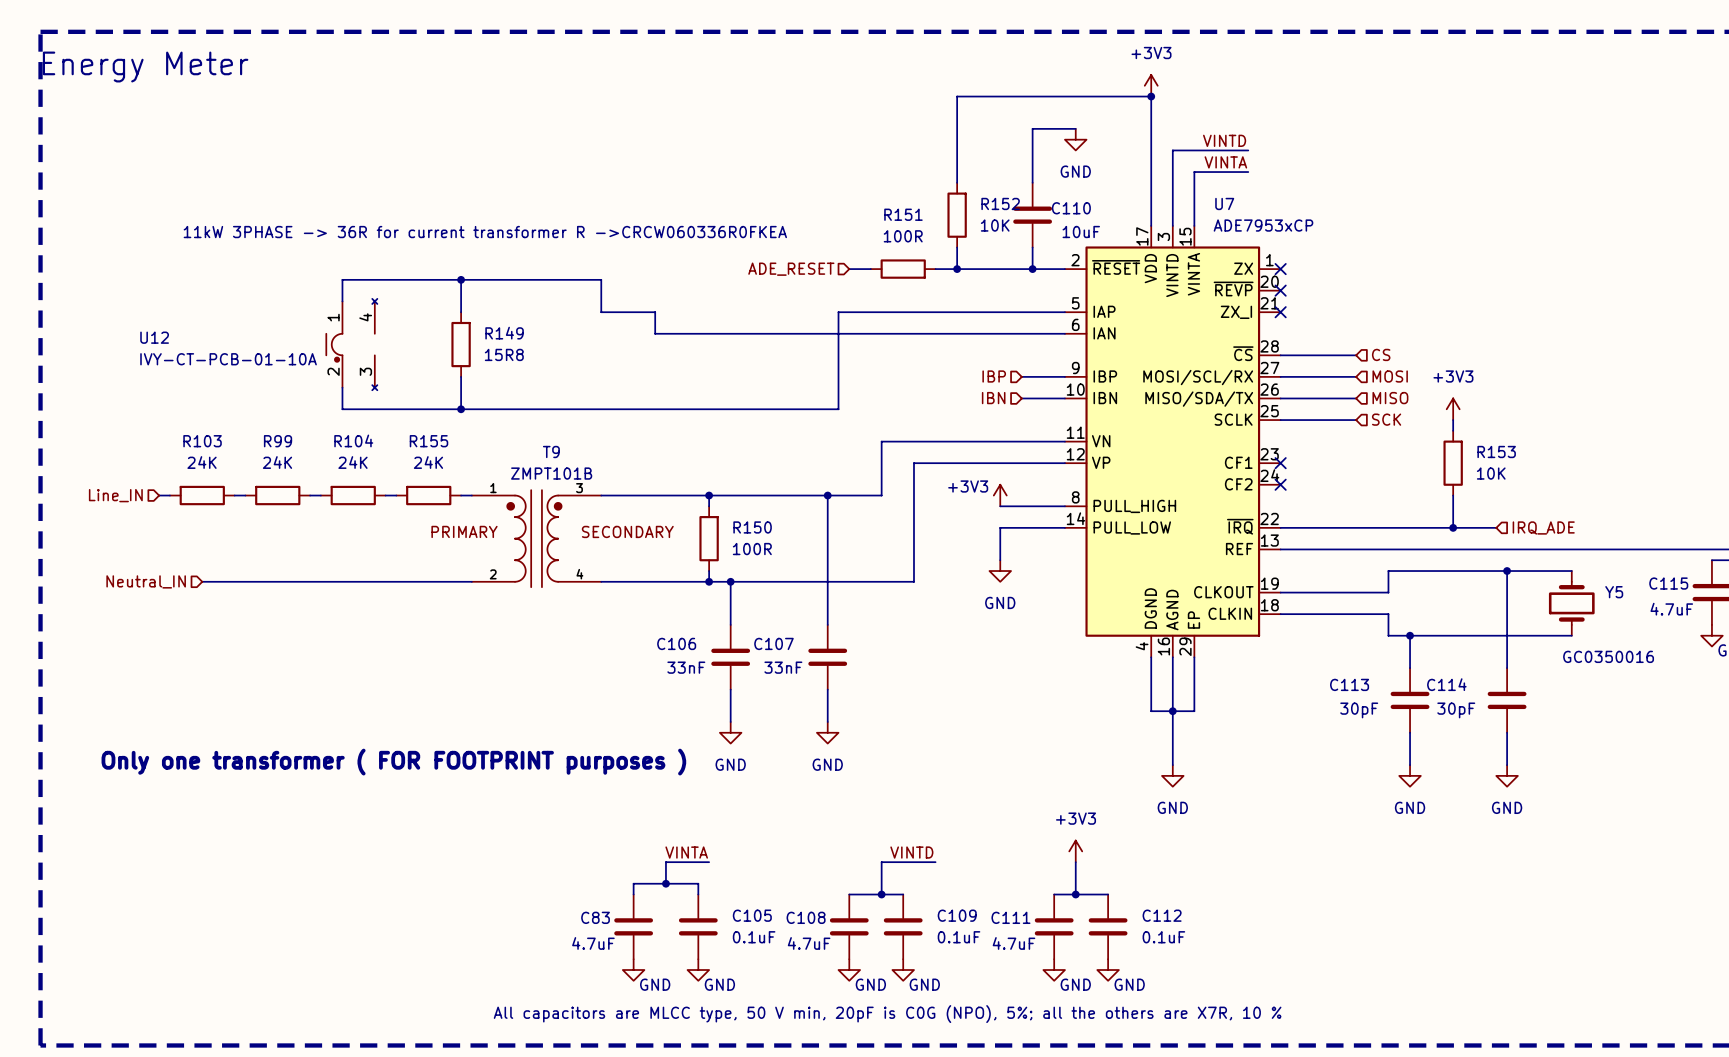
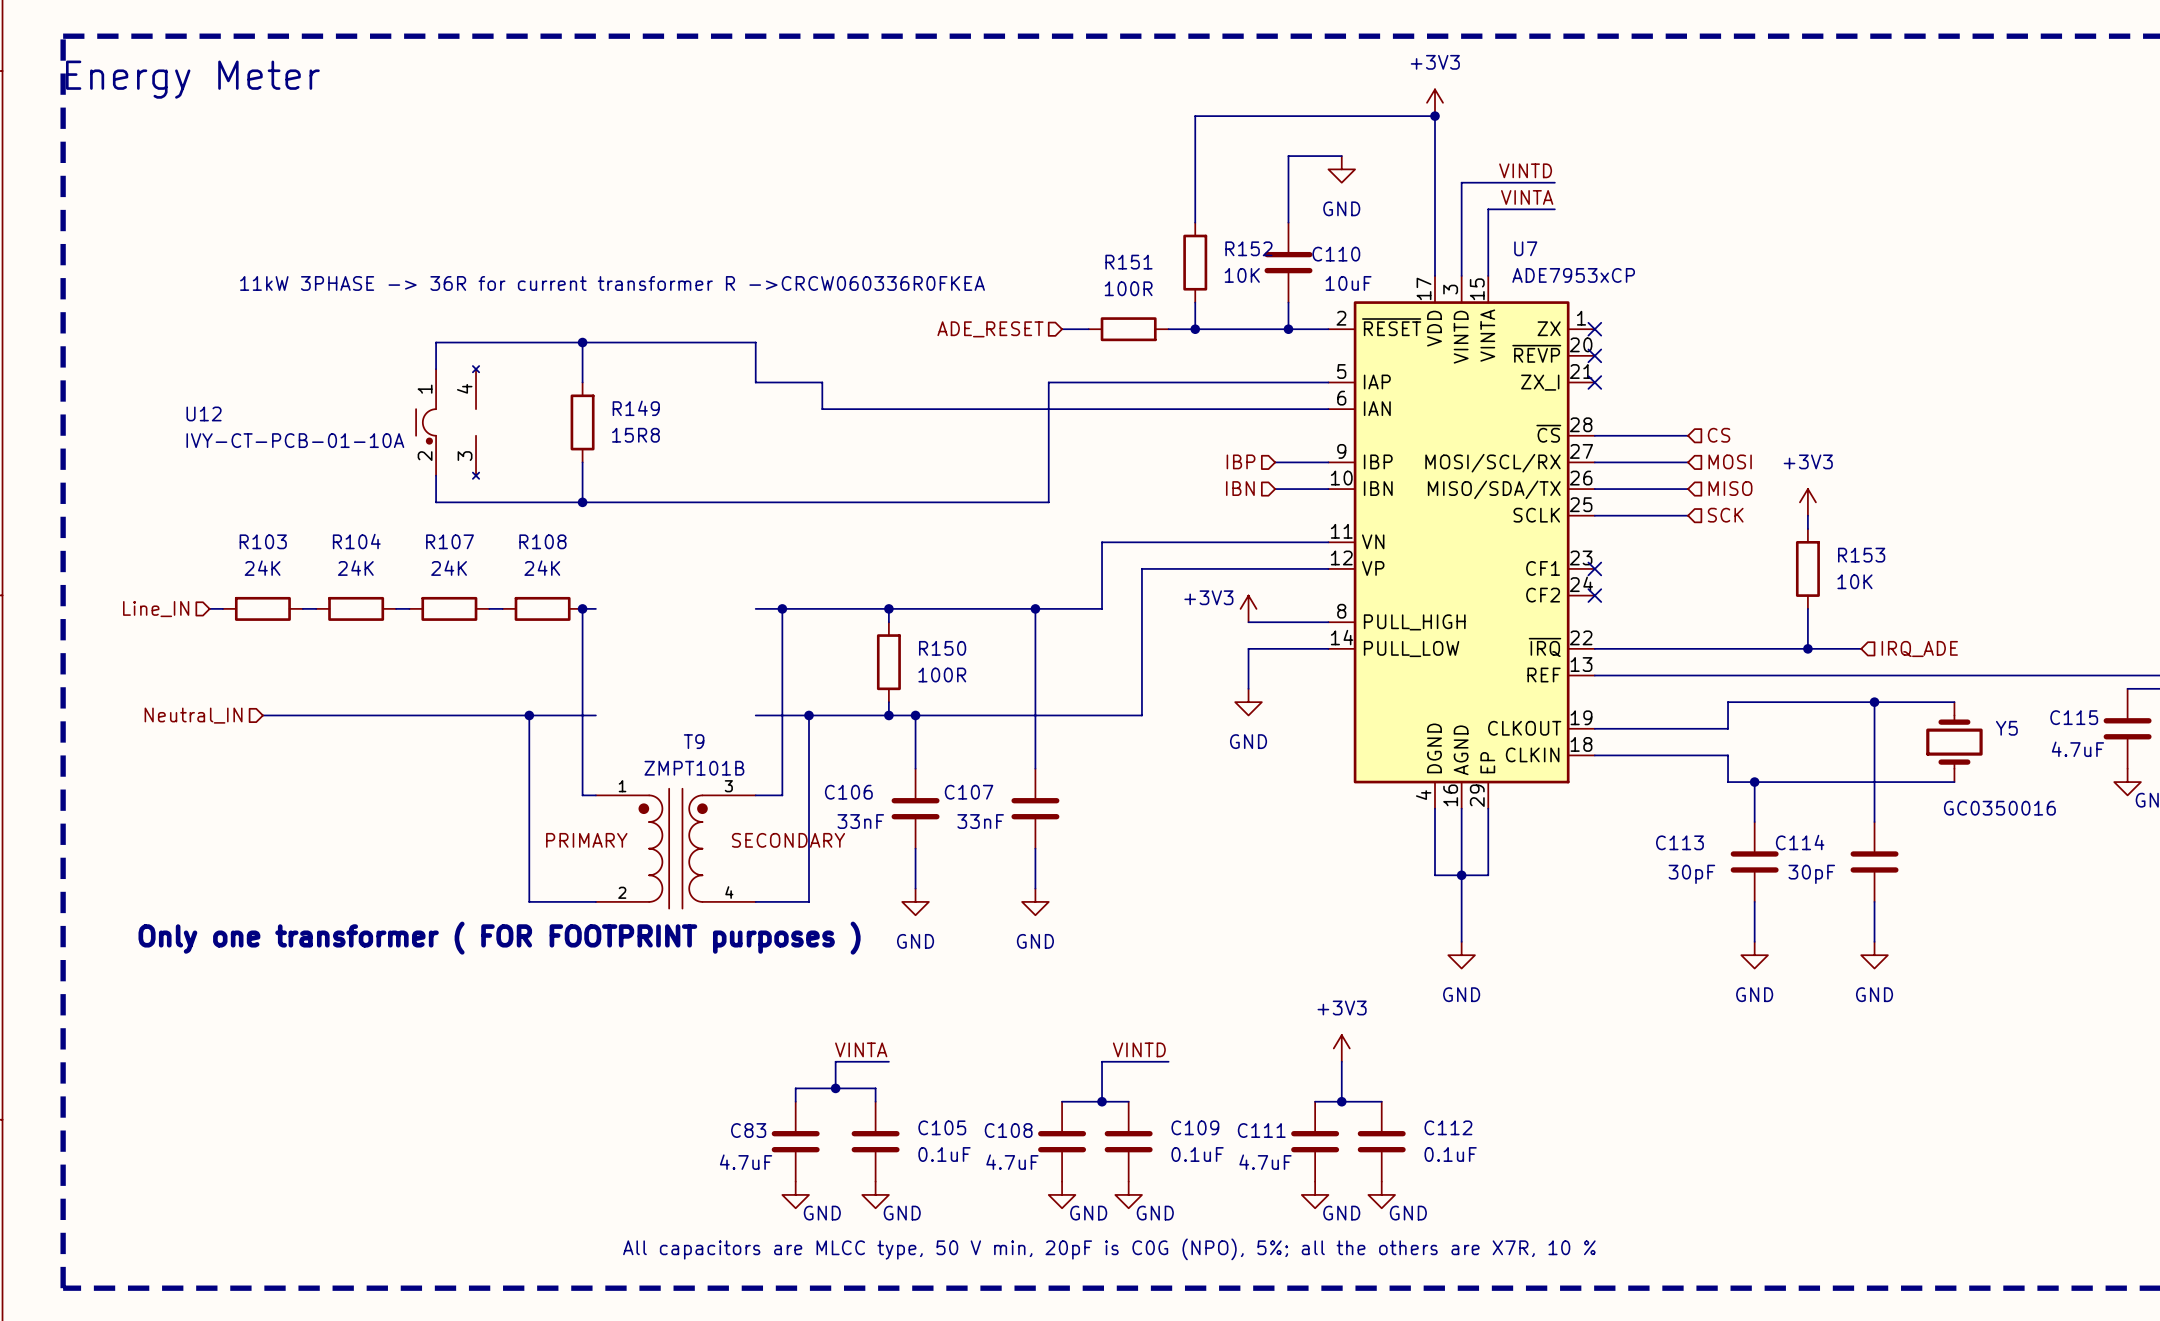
R104 name: R104 (353, 440) -> R107 (450, 541)
R99 name: R99 (278, 441) -> R104 (356, 541)
R155 name: R155 (428, 441) -> R108 (542, 541)
wire: none -> (582, 608) (582, 795) (595, 795)
junction: none -> (582, 608)
wire: none -> (782, 608) (782, 795) (755, 795)
junction: none -> (782, 608)
T9 position: (536, 538) -> (675, 848)
wire: none -> (529, 715) (529, 901) (595, 901)
junction: none -> (529, 715)
wire: none -> (809, 715) (809, 901) (755, 901)
junction: none -> (809, 715)

